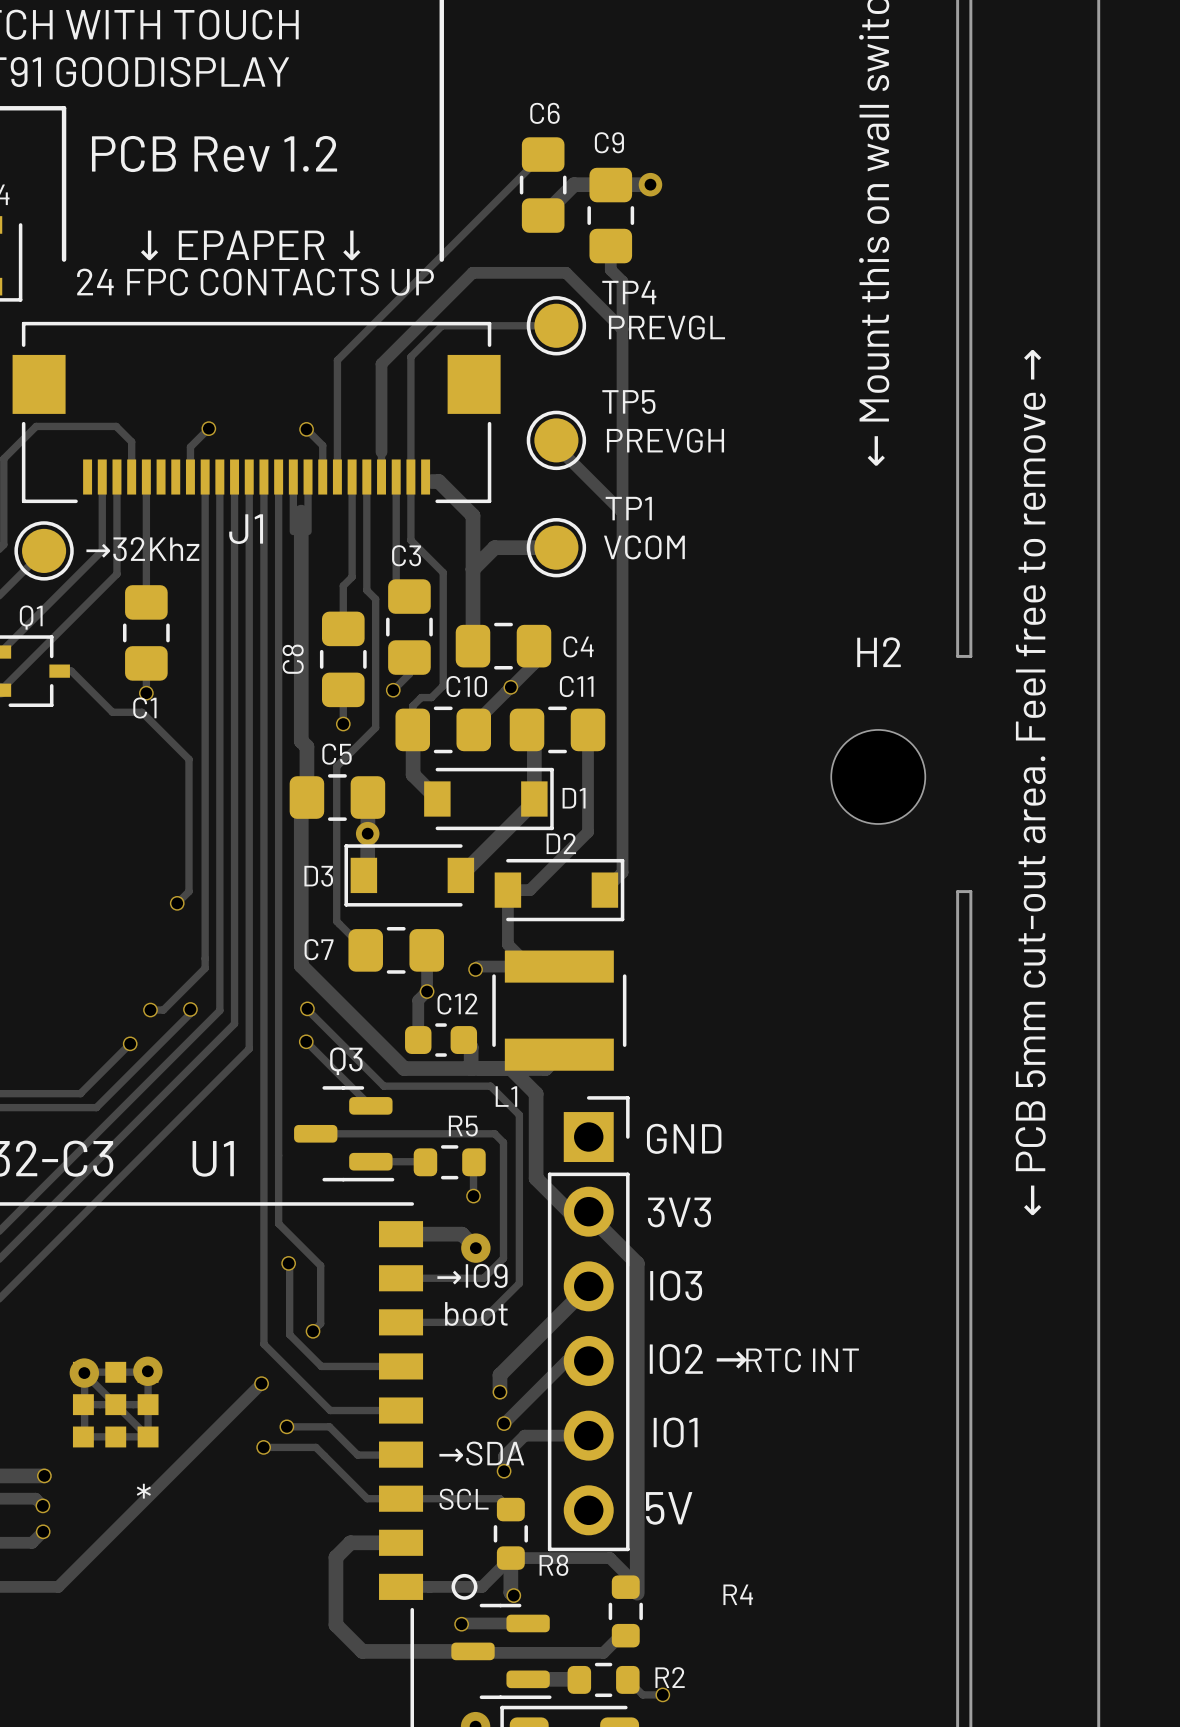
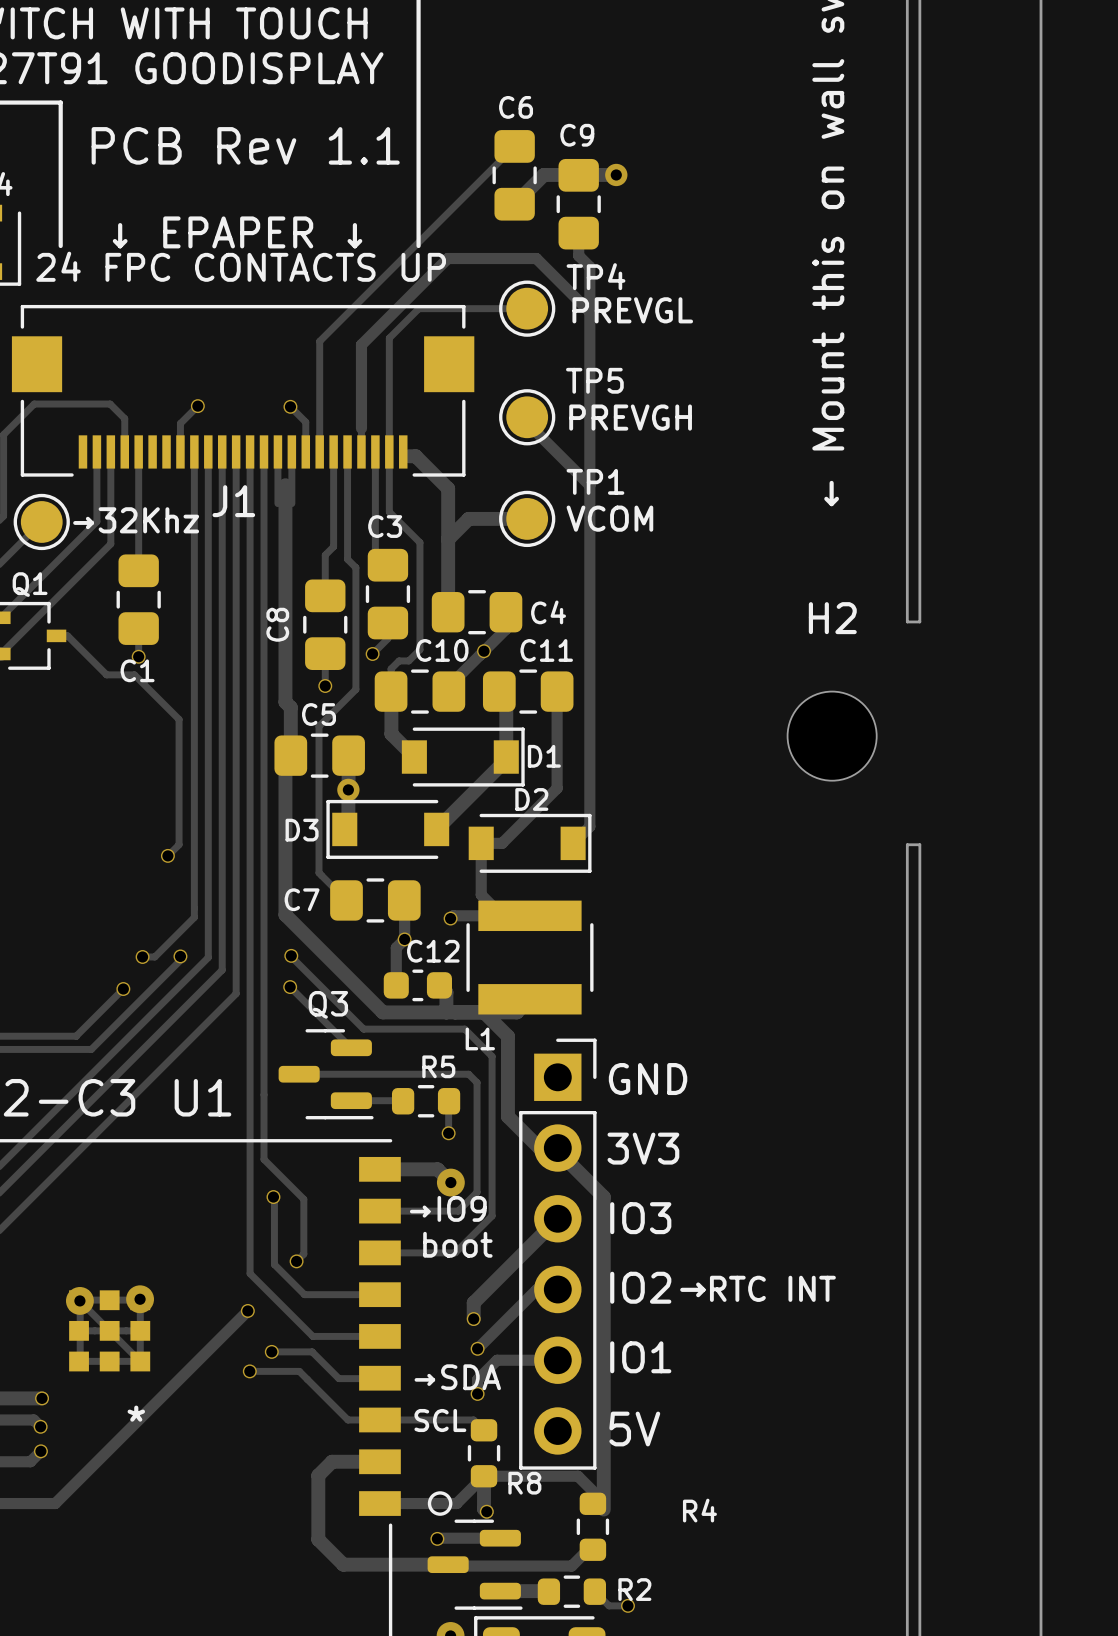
text: PCB Rev 1.2 (214, 153) -> PCB Rev 1.1 (245, 145)
text: ← PCB 5mm cut-out area. Feel free to remove → (1030, 782) -> none

